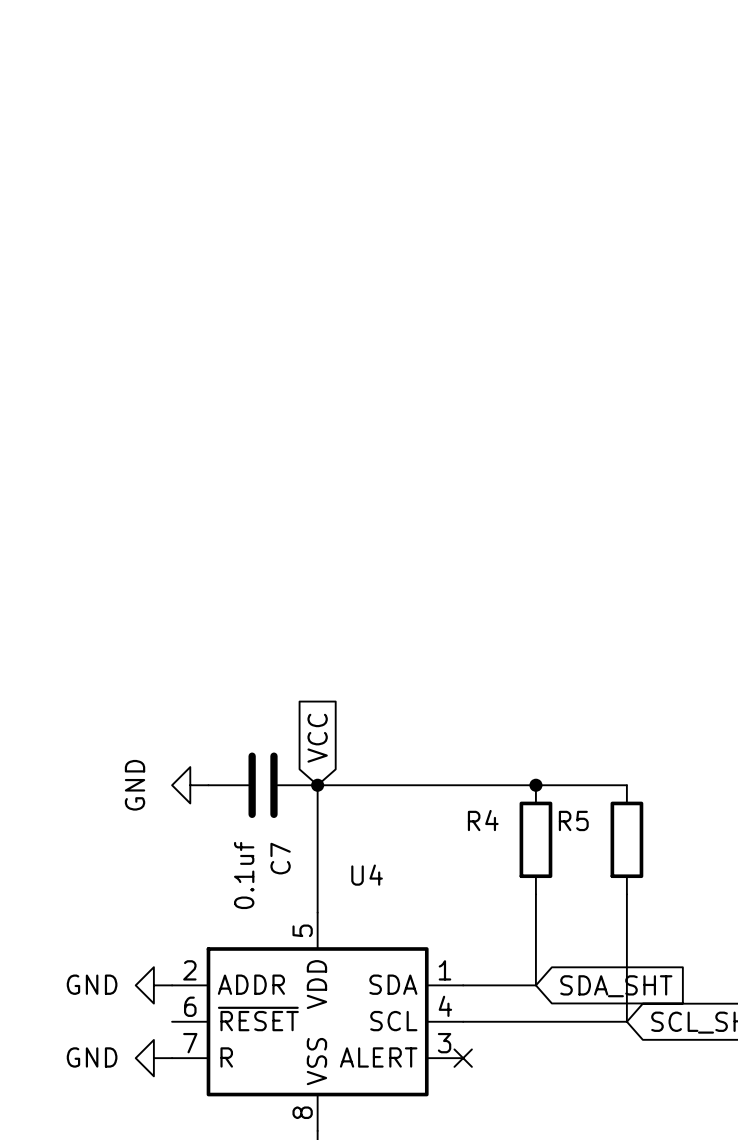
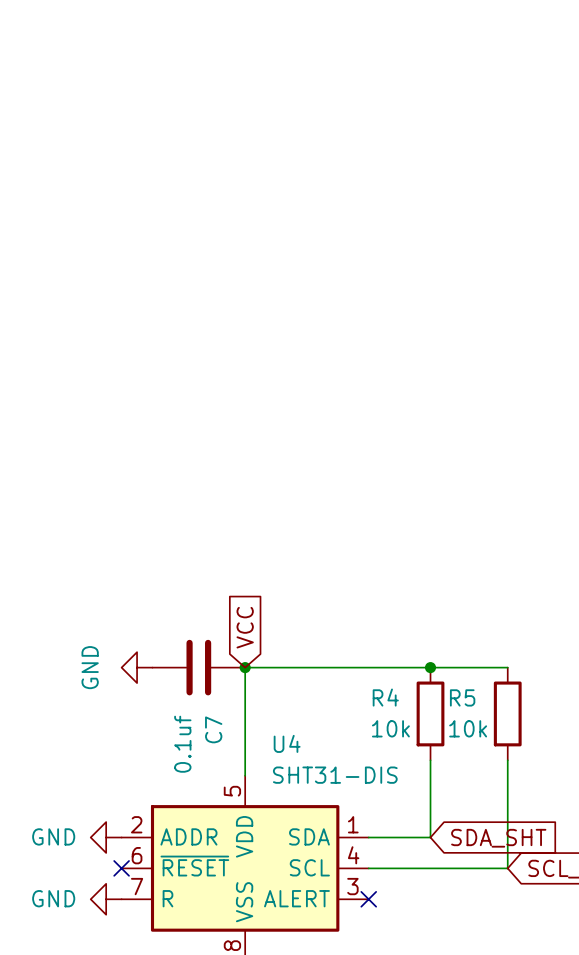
R4 value: none -> 10k (390, 728)
R5 value: none -> 10k (468, 728)
U4 value: none -> SHT31-DIS (335, 775)
no-connect mark: none -> (121, 868)

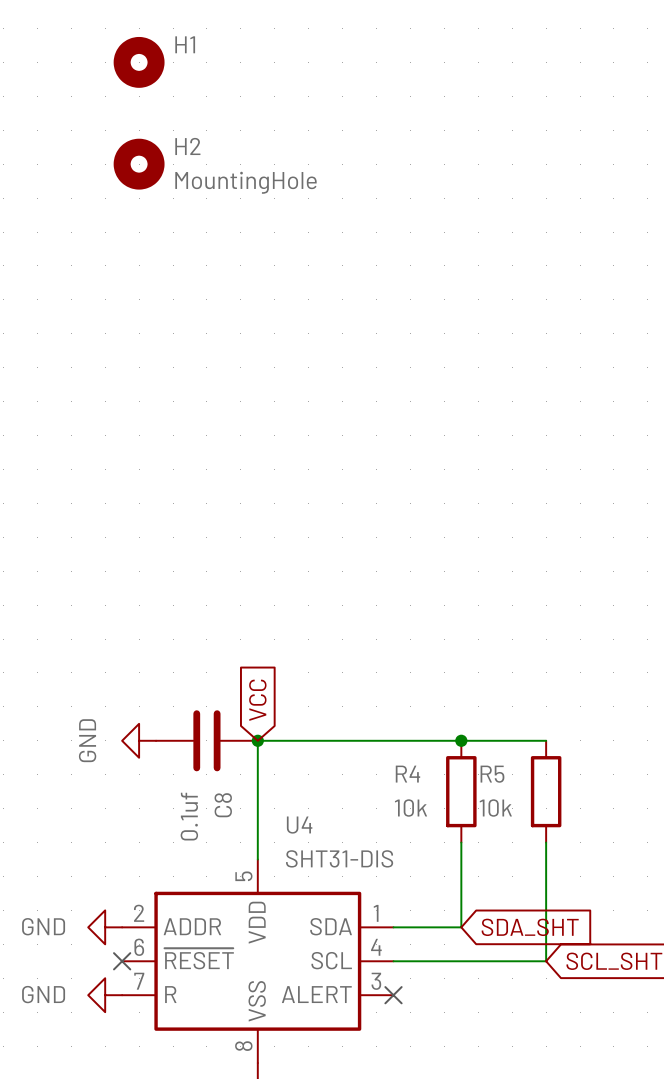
H1: none -> (139, 62)
H2: none -> MountingHole (139, 164)
C7 name: C7 (213, 729) -> C8 (223, 805)

